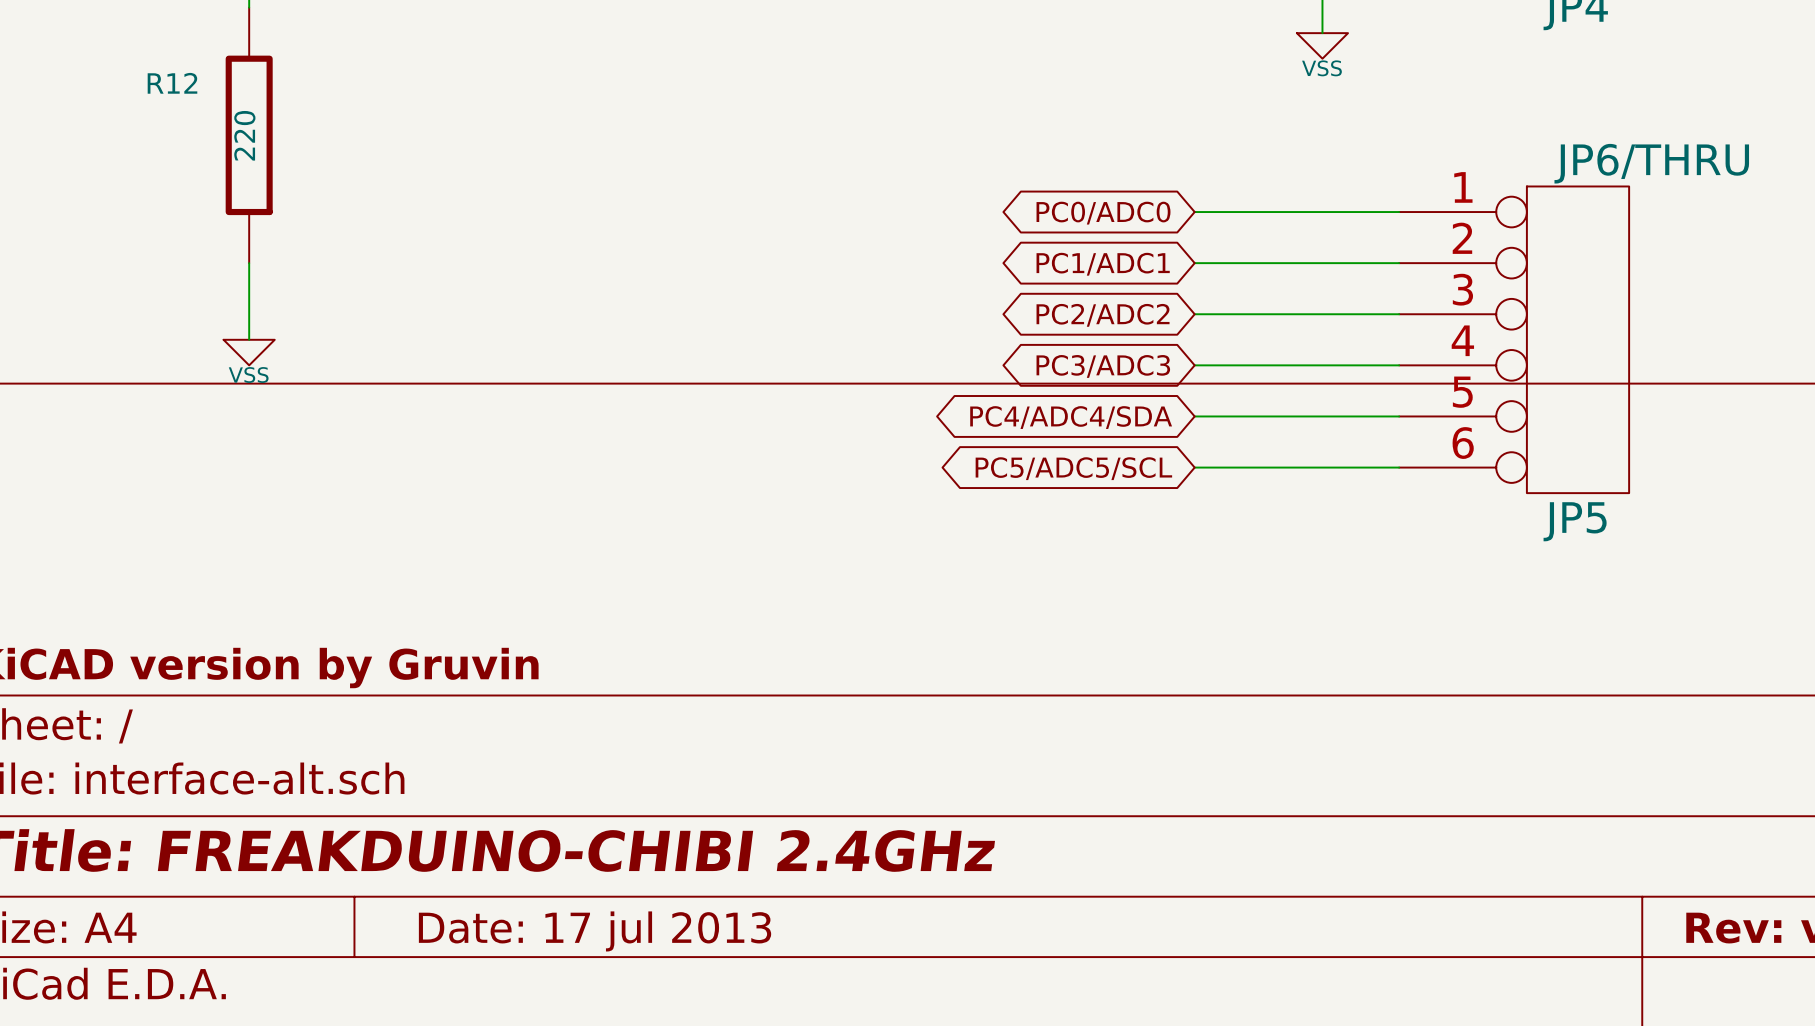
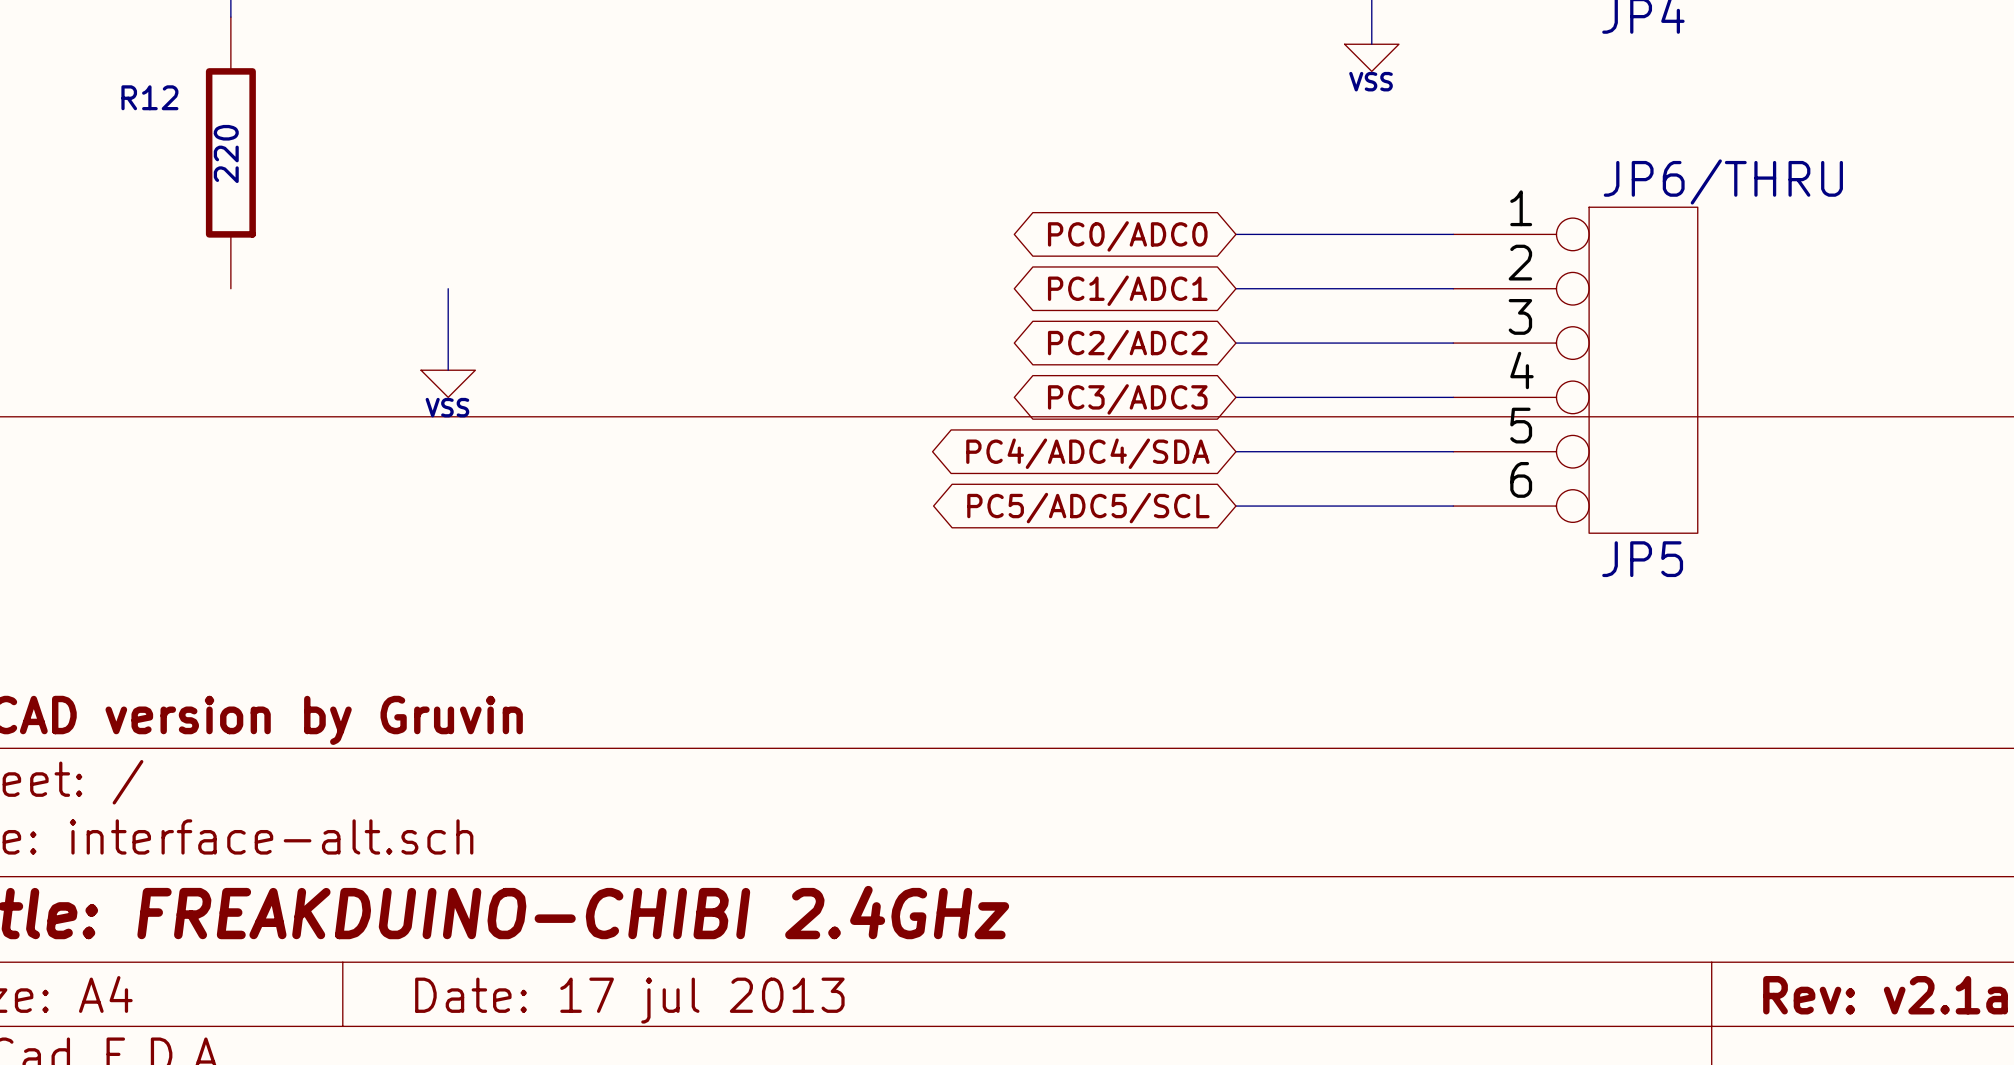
wire: (249, 263) (249, 339) -> (448, 288) (448, 370)
power symbol position: VSS (249, 352) -> VSS (448, 383)

